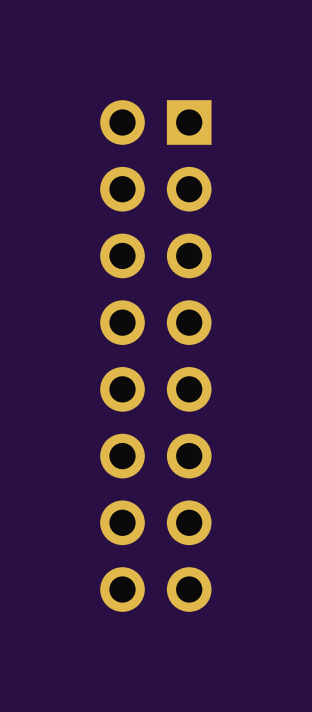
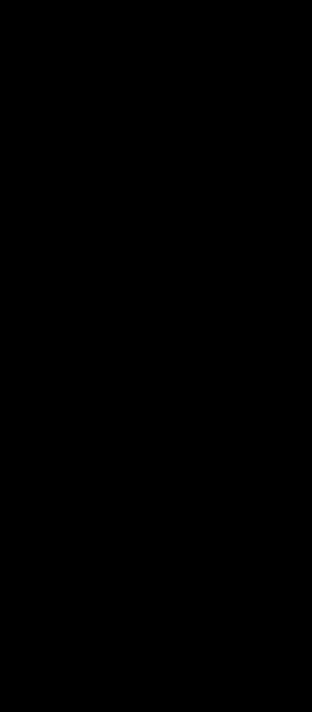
part: (155, 356) -> none

